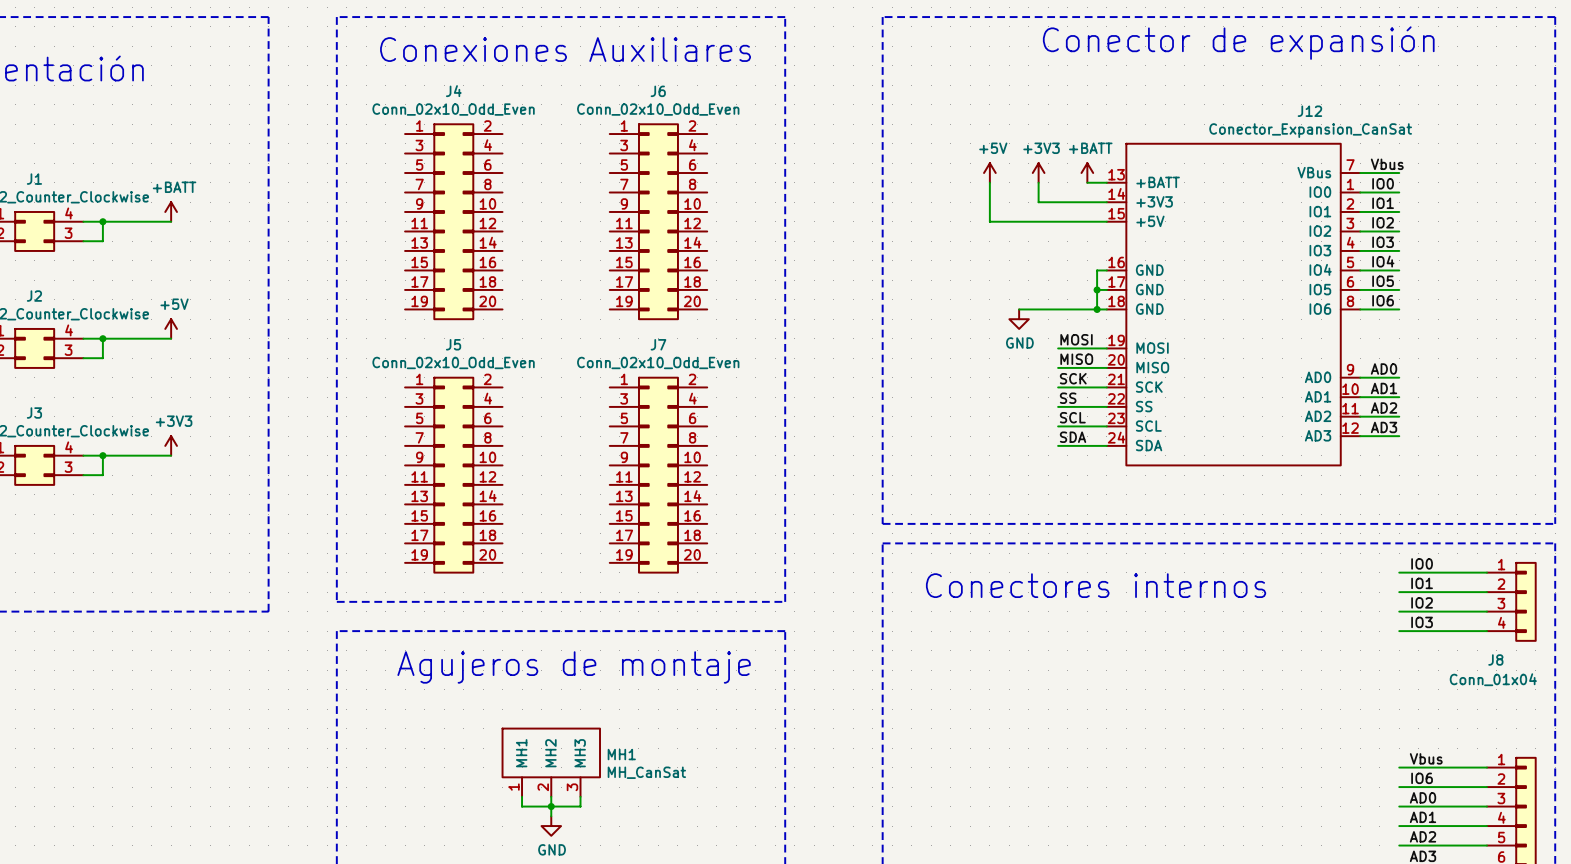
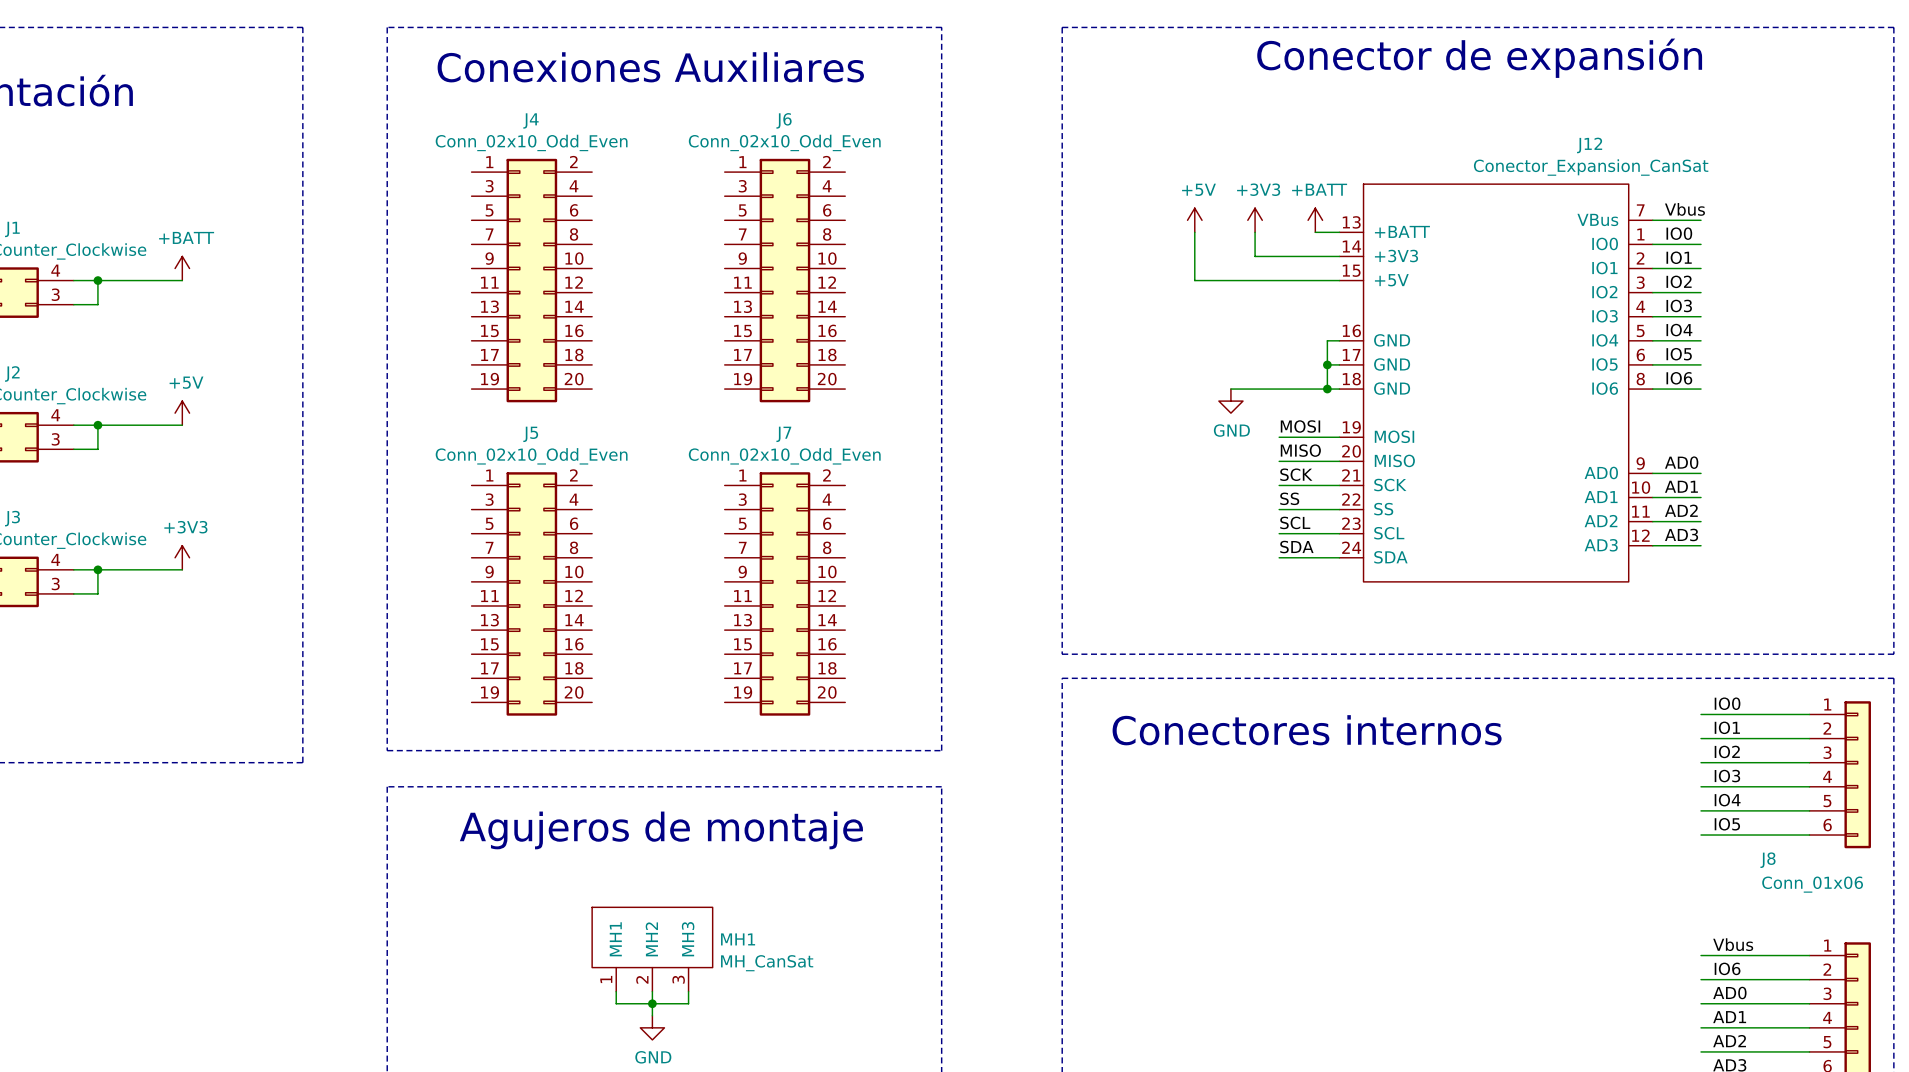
J8 symbol: [1486, 561, 1537, 642] -> [1809, 701, 1871, 849]
label: none -> IO4 (1727, 800)
wire: none -> (1701, 810) (1809, 810)
J8 name position: J8 (1495, 659) -> J8 (1767, 860)
label: none -> IO5 (1727, 824)
wire: none -> (1701, 835) (1809, 835)
J8 value: Conn_01x04 (1493, 679) -> Conn_01x06 (1812, 884)

